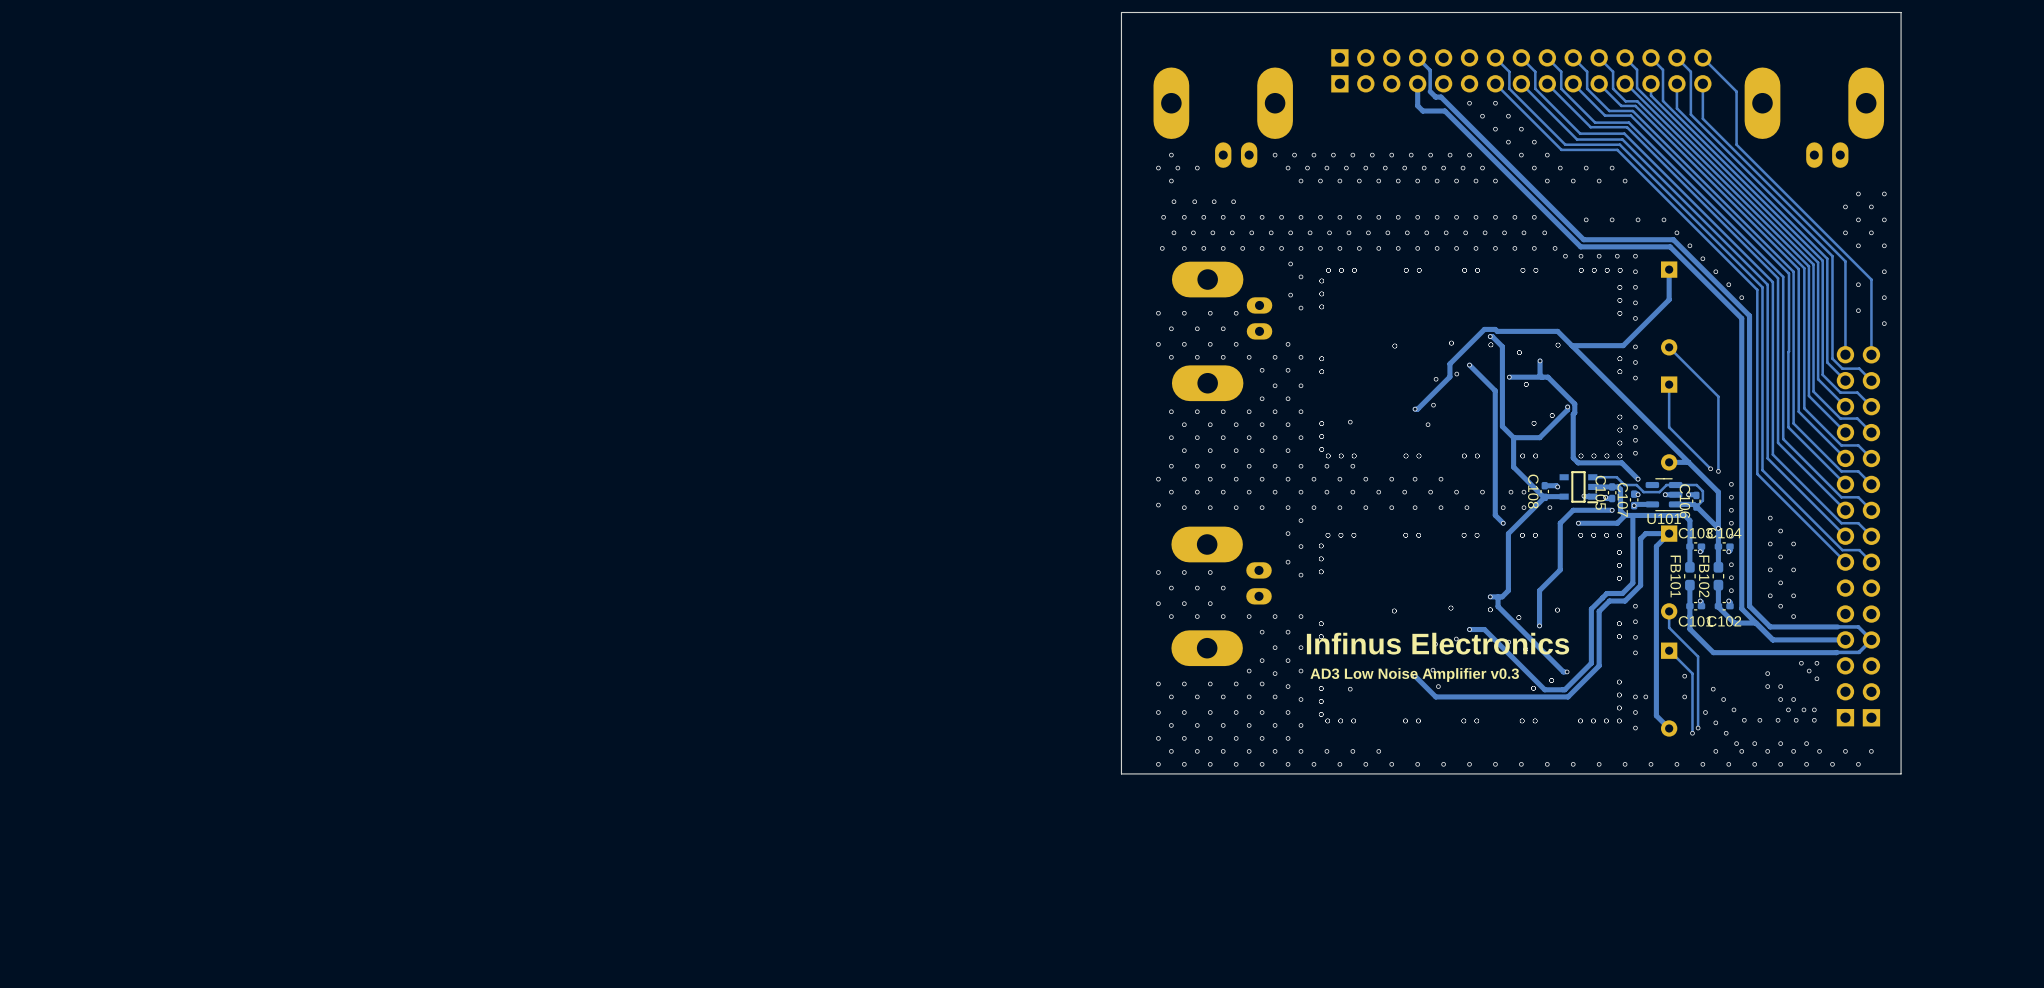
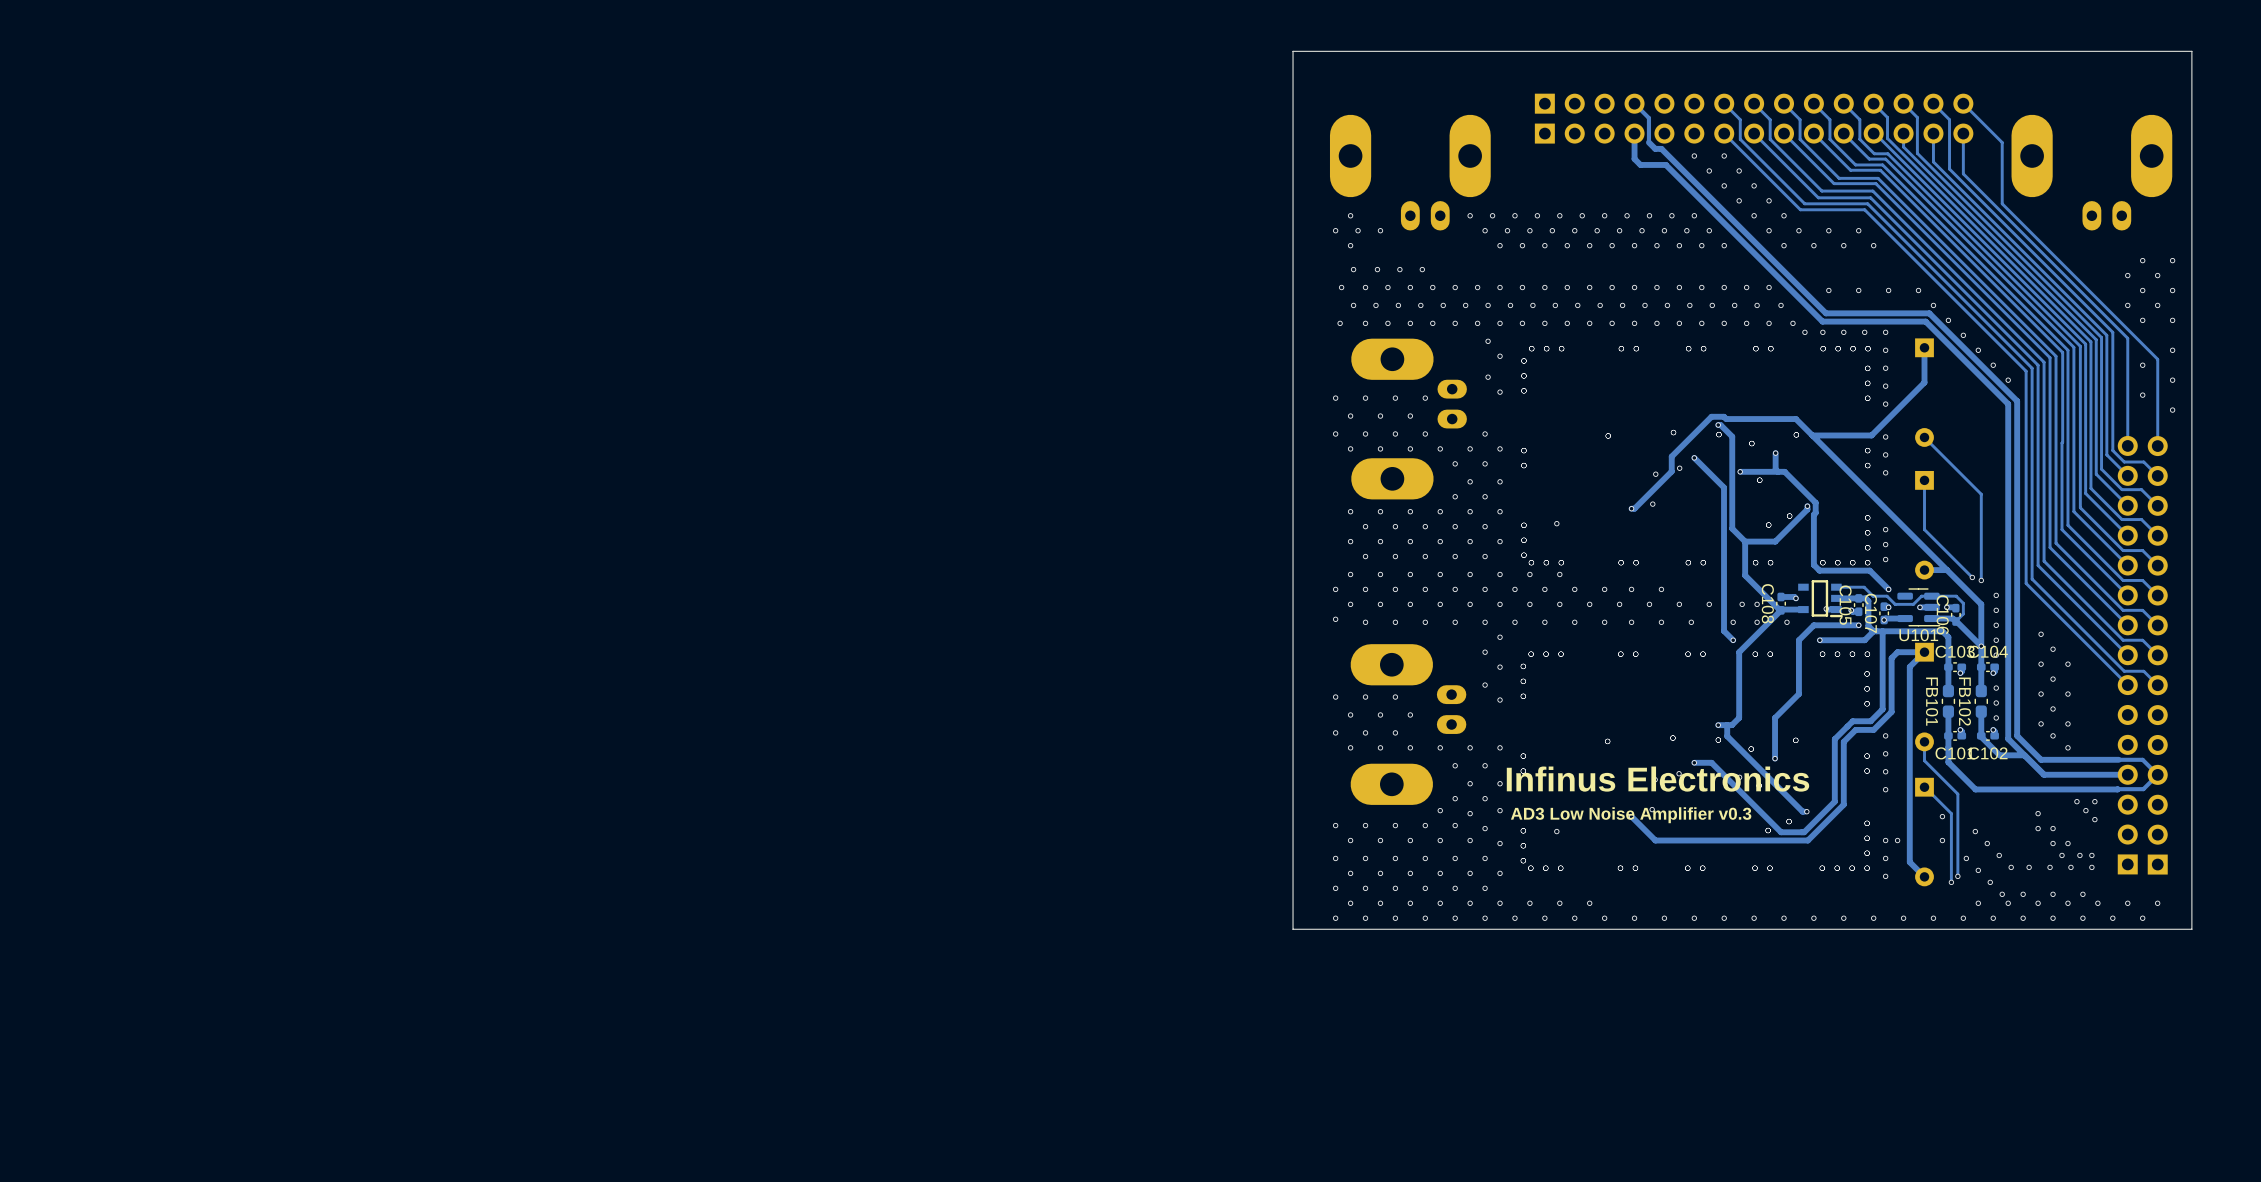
via: (1428, 424) -> none
via: (1438, 686) -> none

